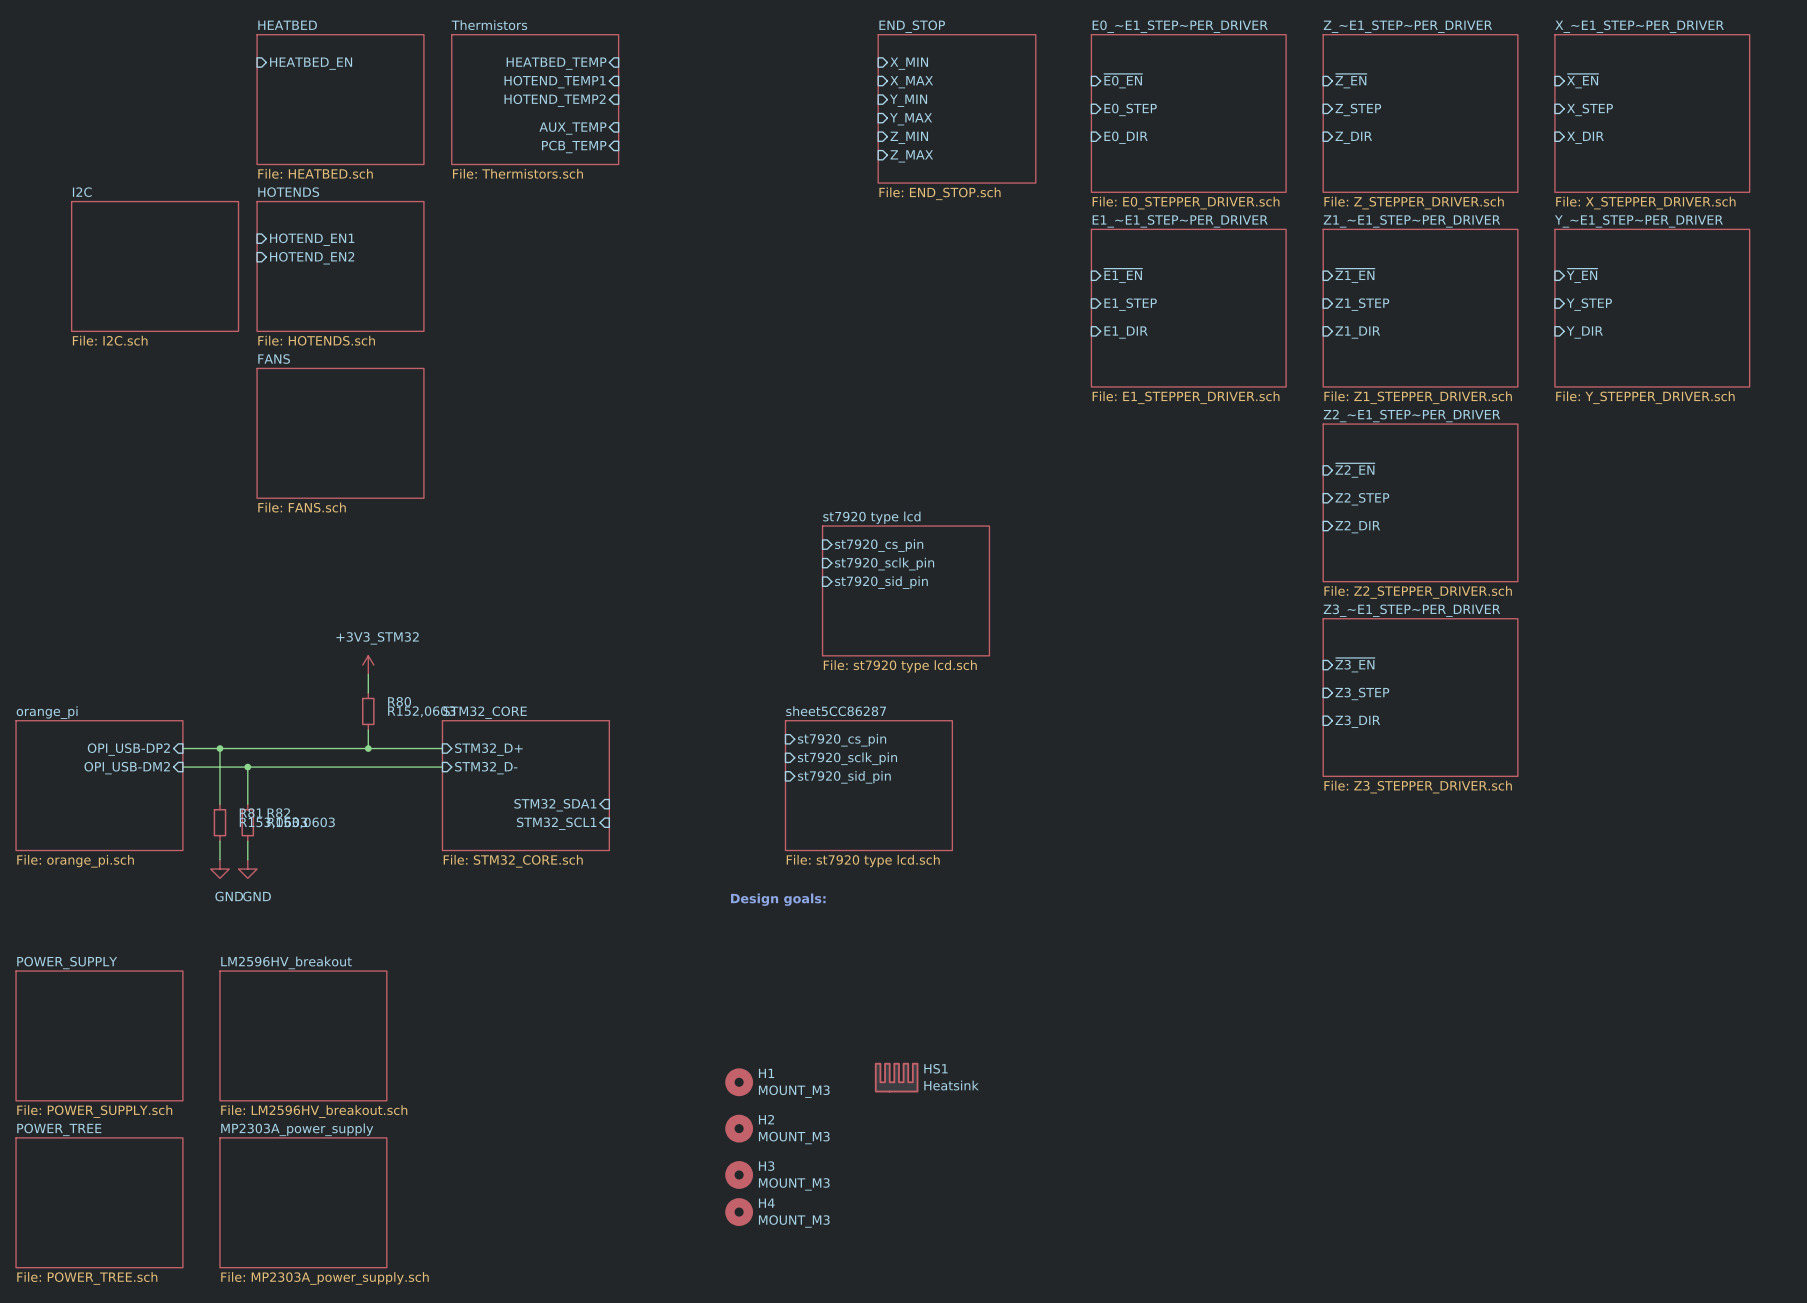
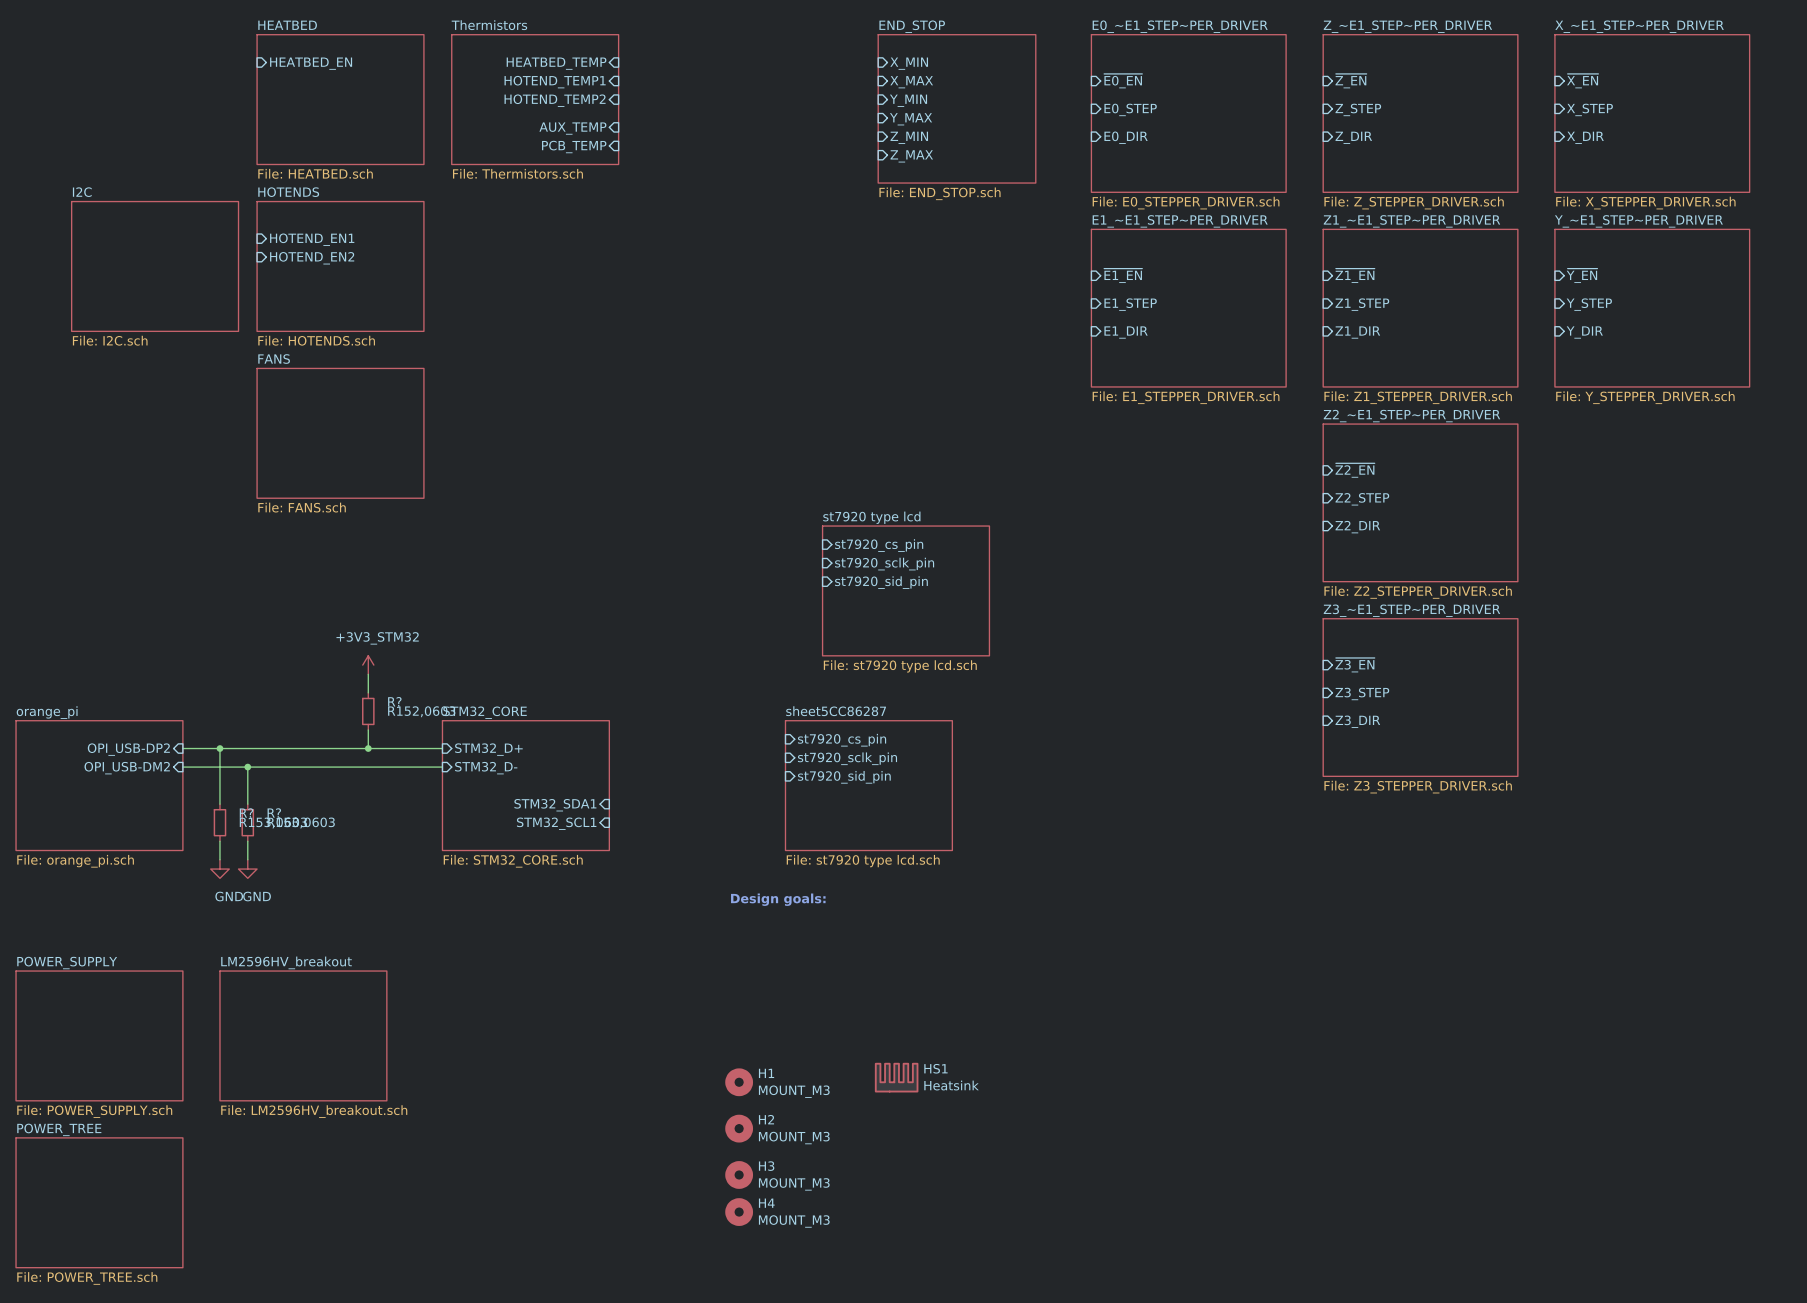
R80 name: R80 (399, 701) -> R? (394, 701)
R81 name: R81 (251, 813) -> R? (246, 812)
R82 name: R82 (278, 813) -> R? (274, 812)
sheet MP2303A_power_supply: File: MP2303A_power_supply.sch (303, 1202) -> none

